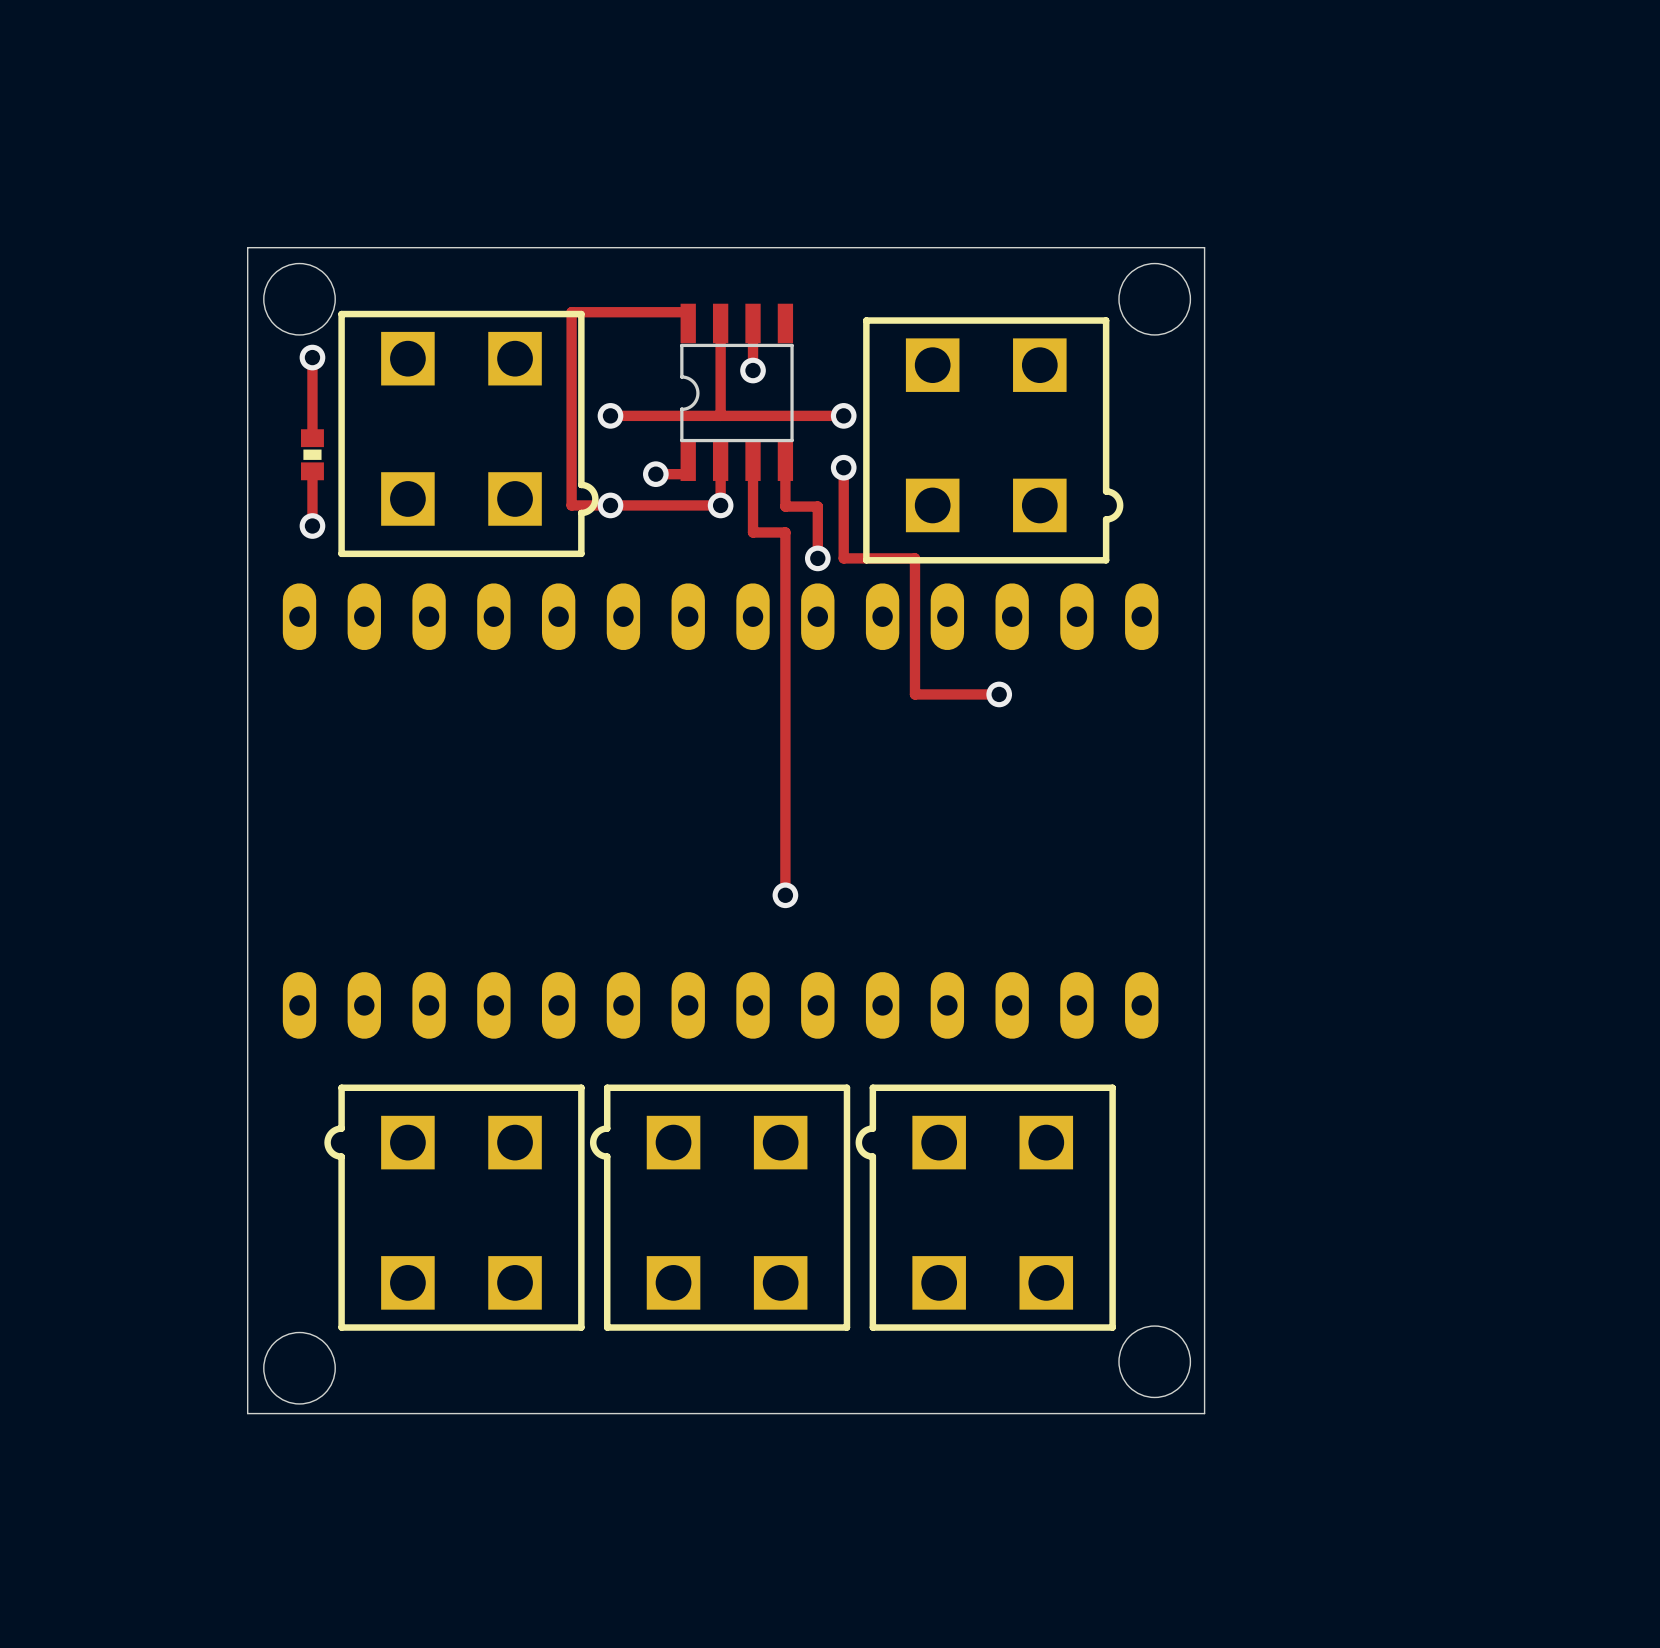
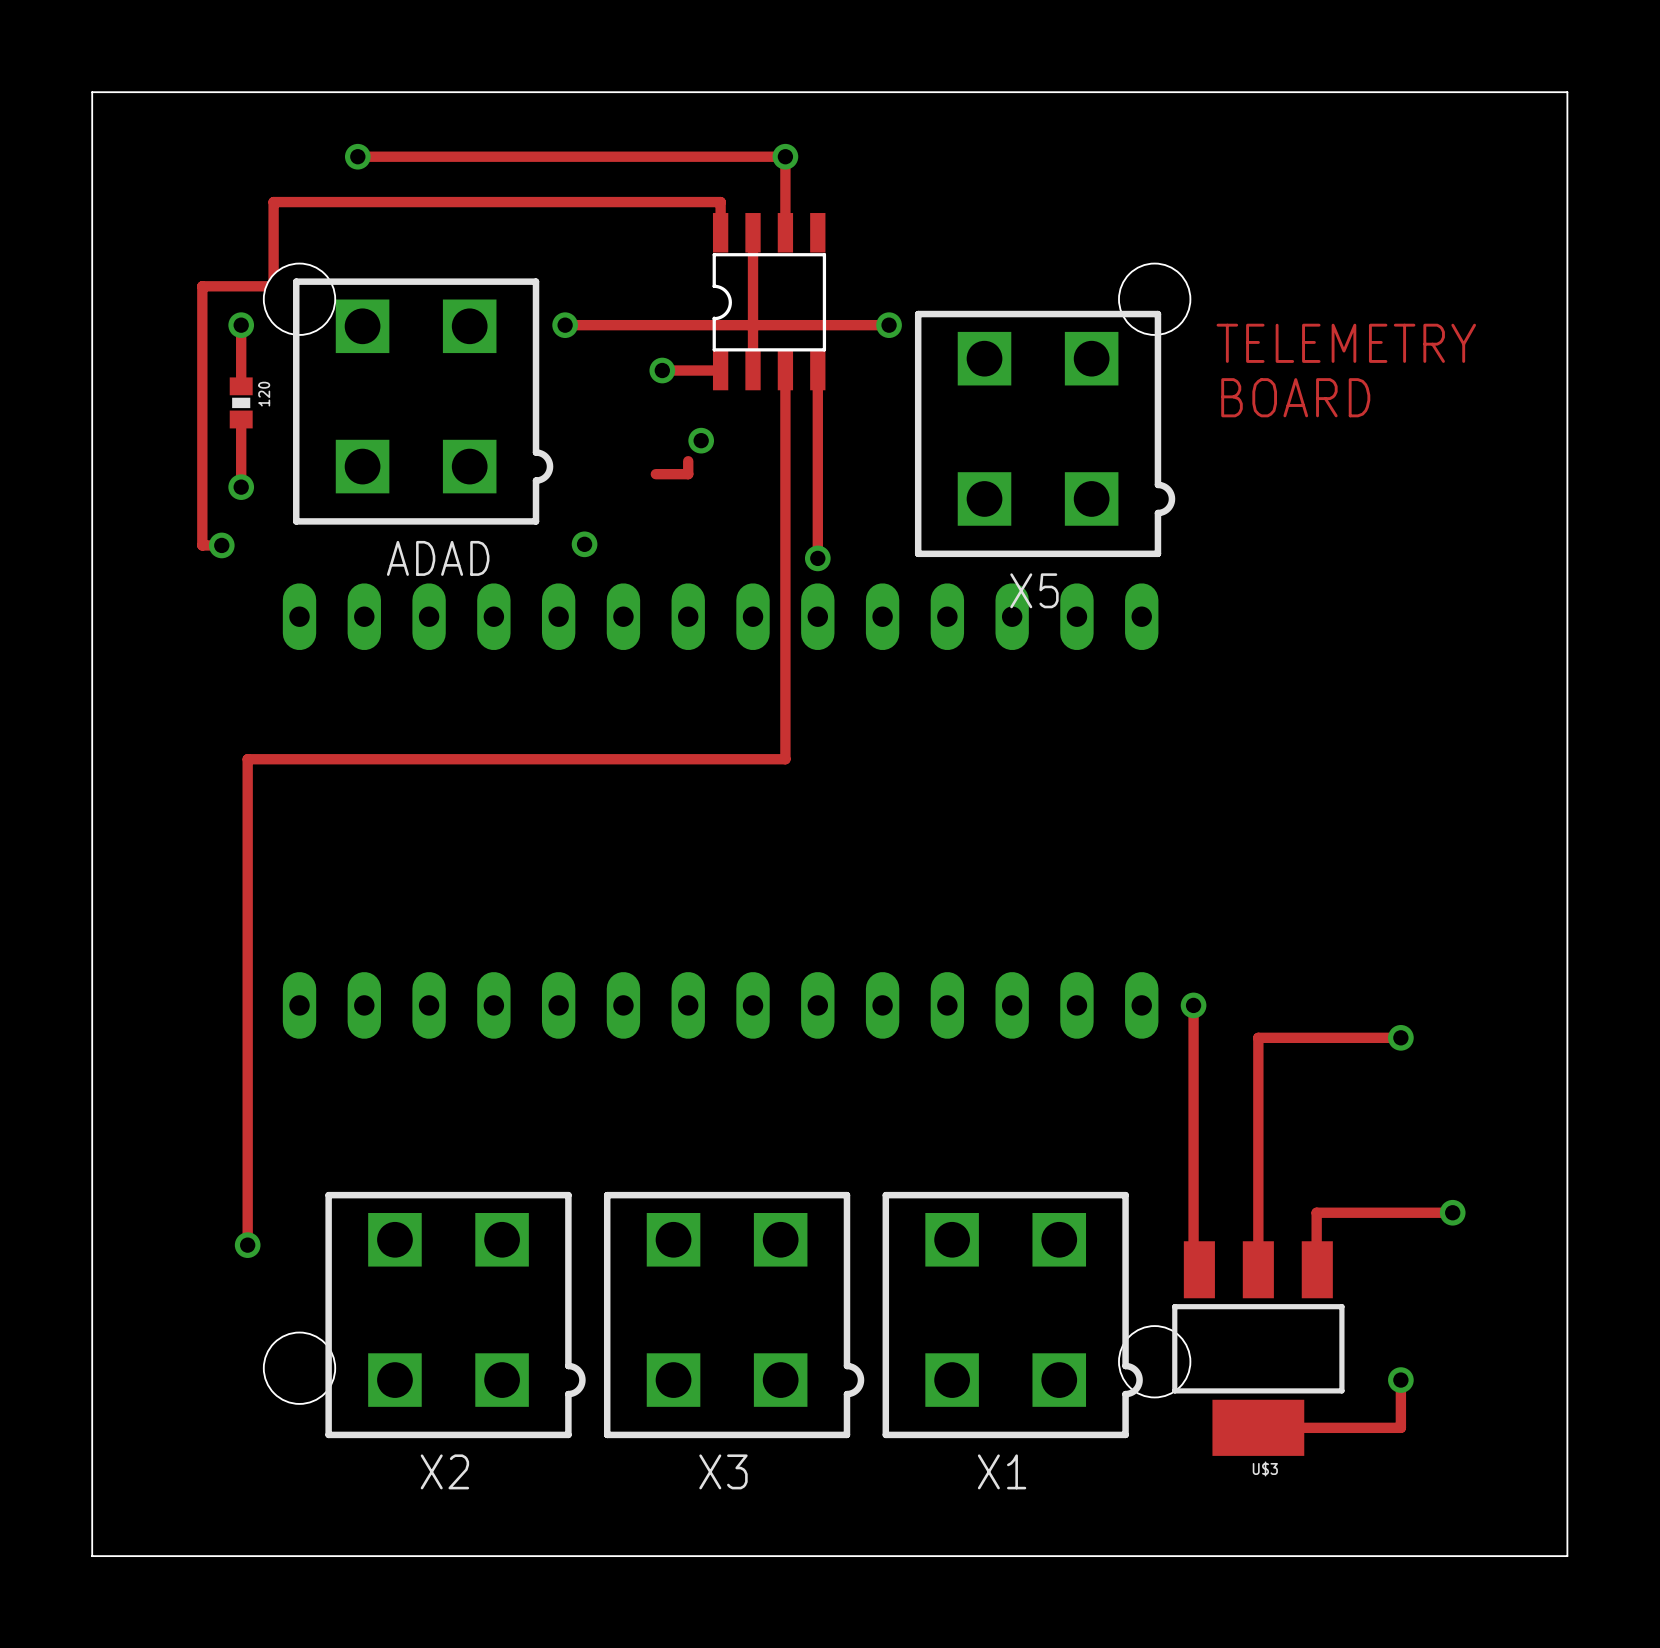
track: none -> (357, 156) (785, 156) (785, 232)
via: none -> (357, 156)
via: none -> (785, 156)
track: none -> (720, 232) (720, 202) (273, 202) (273, 286) (202, 286) (202, 545) (221, 545)
track: none -> (753, 232) (753, 323)
board edge: (247, 247) (1204, 247) (1204, 1413) (247, 1413) (247, 247) -> (92, 92) (92, 1556) (1567, 1556) (1567, 92) (92, 92)
track: (688, 323) (688, 312) (571, 312) (571, 505) (720, 505) (720, 461) -> none
track: (720, 323) (720, 415) -> none
track: none -> (241, 325) (241, 386)
via: none -> (241, 325)
track: none -> (565, 325) (889, 325)
via: none -> (565, 325)
via: none -> (889, 325)
text: none -> TELEMETRY (1346, 343)
track: (312, 357) (312, 438) -> none
via: (312, 357) -> none
track: none -> (662, 370) (720, 370)
via: none -> (662, 370)
via: (753, 370) -> none
track: none -> (785, 370) (785, 461)
track: none -> (817, 370) (817, 506)
part position: (736, 392) -> (769, 301)
text: none -> BOARD (1295, 397)
ADAD: none -> (423, 401)
120: none -> (241, 402)
track: (610, 415) (843, 415) -> none
via: (610, 415) -> none
via: (843, 415) -> none
track: none -> (241, 419) (241, 487)
part: (468, 433) -> none
X5: none -> (1045, 433)
via: none -> (701, 440)
part: (993, 440) -> none
part: (312, 454) -> none
track: (753, 461) (753, 532) (785, 532) -> none
track: (843, 467) (843, 558) (914, 558) (914, 694) (999, 694) -> none
via: (843, 467) -> none
track: (312, 471) (312, 526) -> none
via: (655, 474) -> none
via: none -> (241, 487)
via position: (610, 505) -> (584, 544)
via: (720, 505) -> none
track: (785, 506) (817, 506) -> (785, 506) (785, 532)
via: (312, 526) -> none
via: none -> (221, 545)
via: (999, 694) -> none
track: (785, 759) (785, 895) -> (785, 759) (247, 759) (247, 1245)
via: (785, 895) -> none
track: none -> (1193, 1005) (1193, 1269) (1199, 1269)
via: none -> (1193, 1005)
track: none -> (1400, 1037) (1258, 1037) (1258, 1269)
via: none -> (1400, 1037)
part: (454, 1207) -> none
part: (720, 1207) -> none
part: (985, 1207) -> none
track: none -> (1452, 1212) (1316, 1212) (1317, 1269)
via: none -> (1452, 1212)
via: none -> (247, 1245)
X2: none -> (455, 1315)
X3: none -> (734, 1315)
X1: none -> (1012, 1315)
U$3: none -> (1258, 1348)
track: none -> (1400, 1380) (1400, 1427) (1258, 1427)
via: none -> (1400, 1380)

